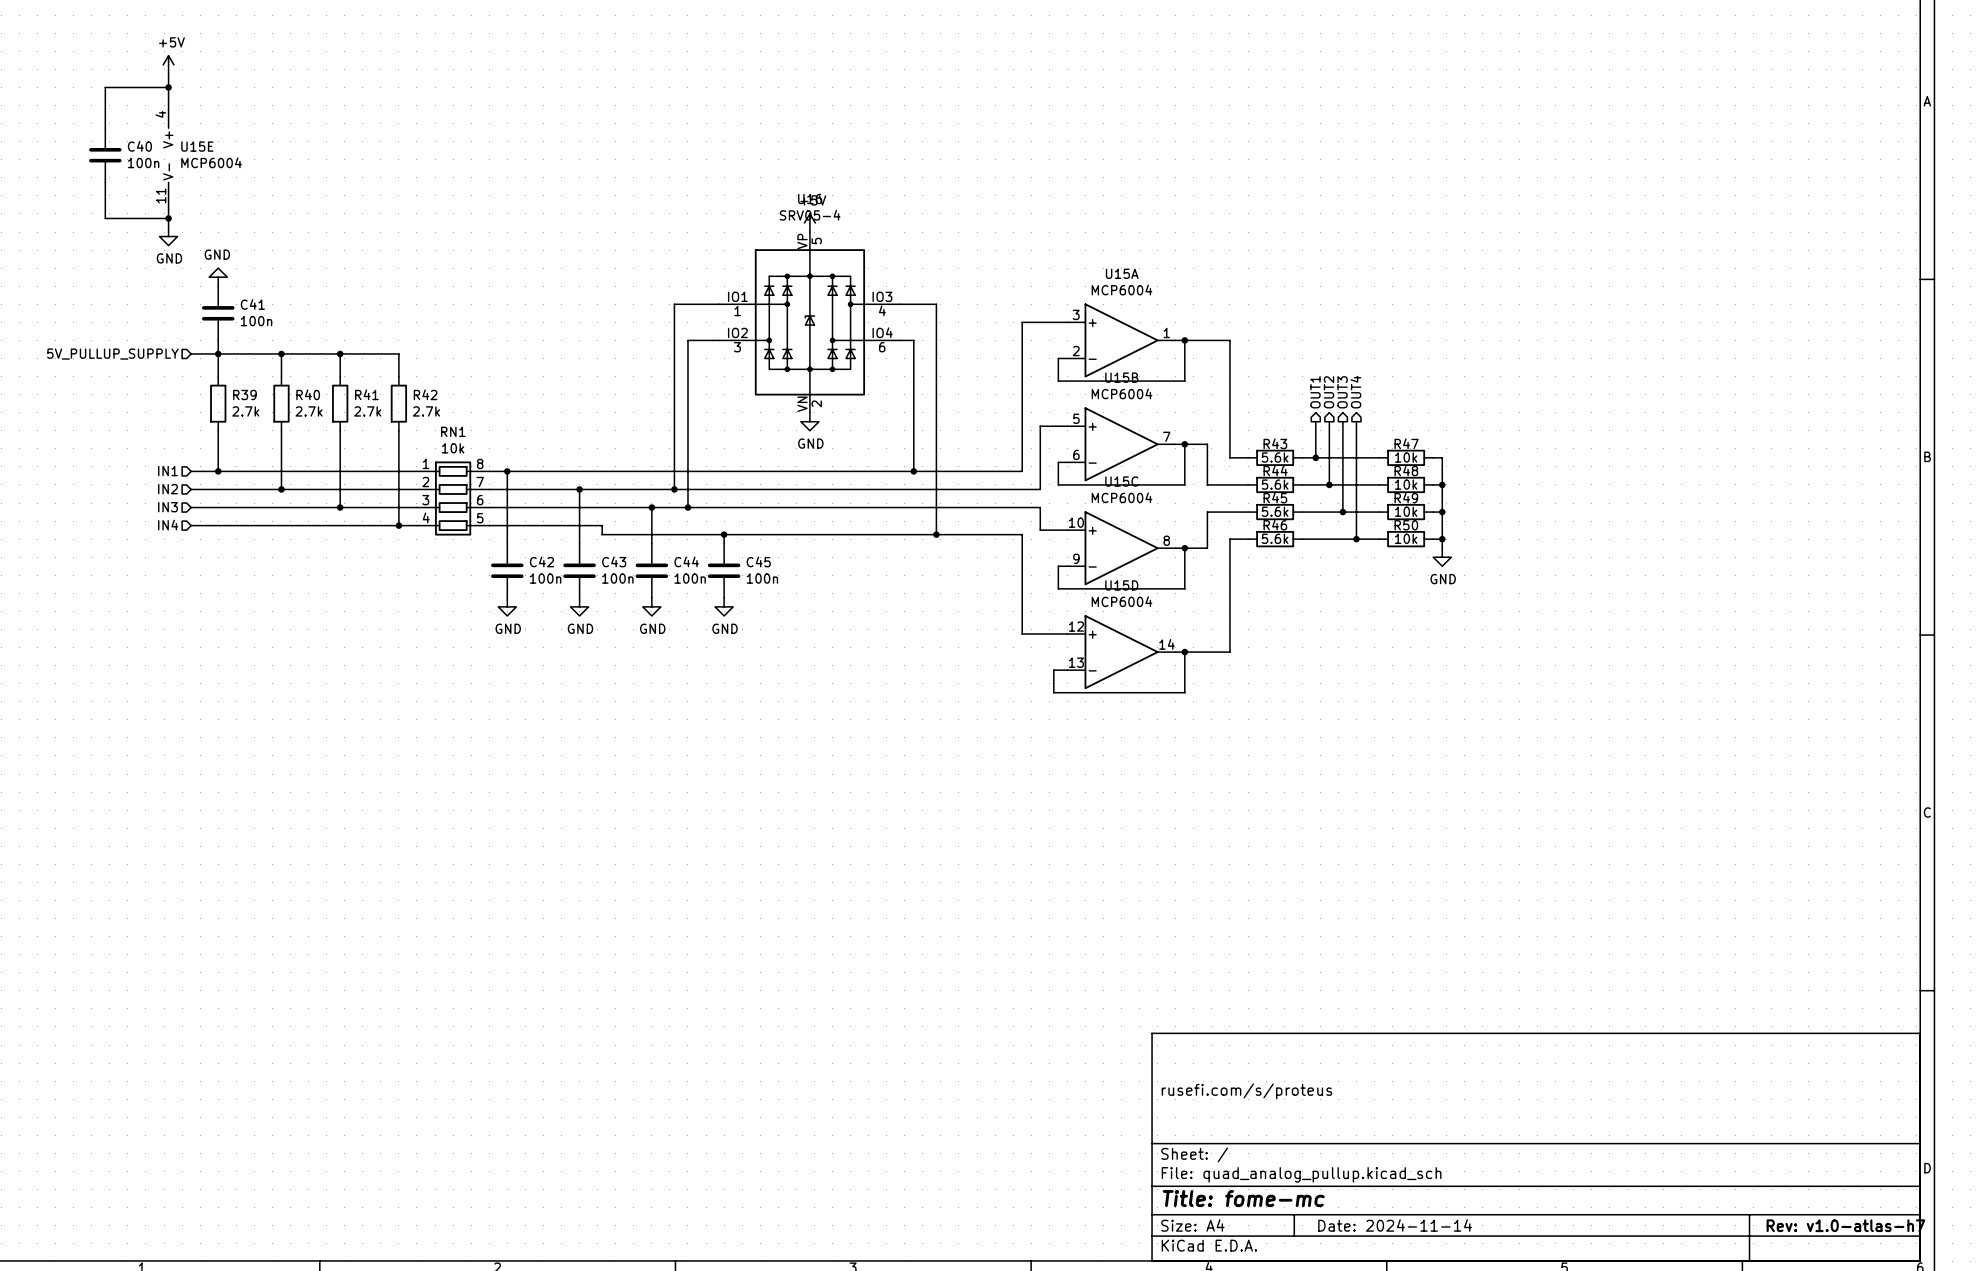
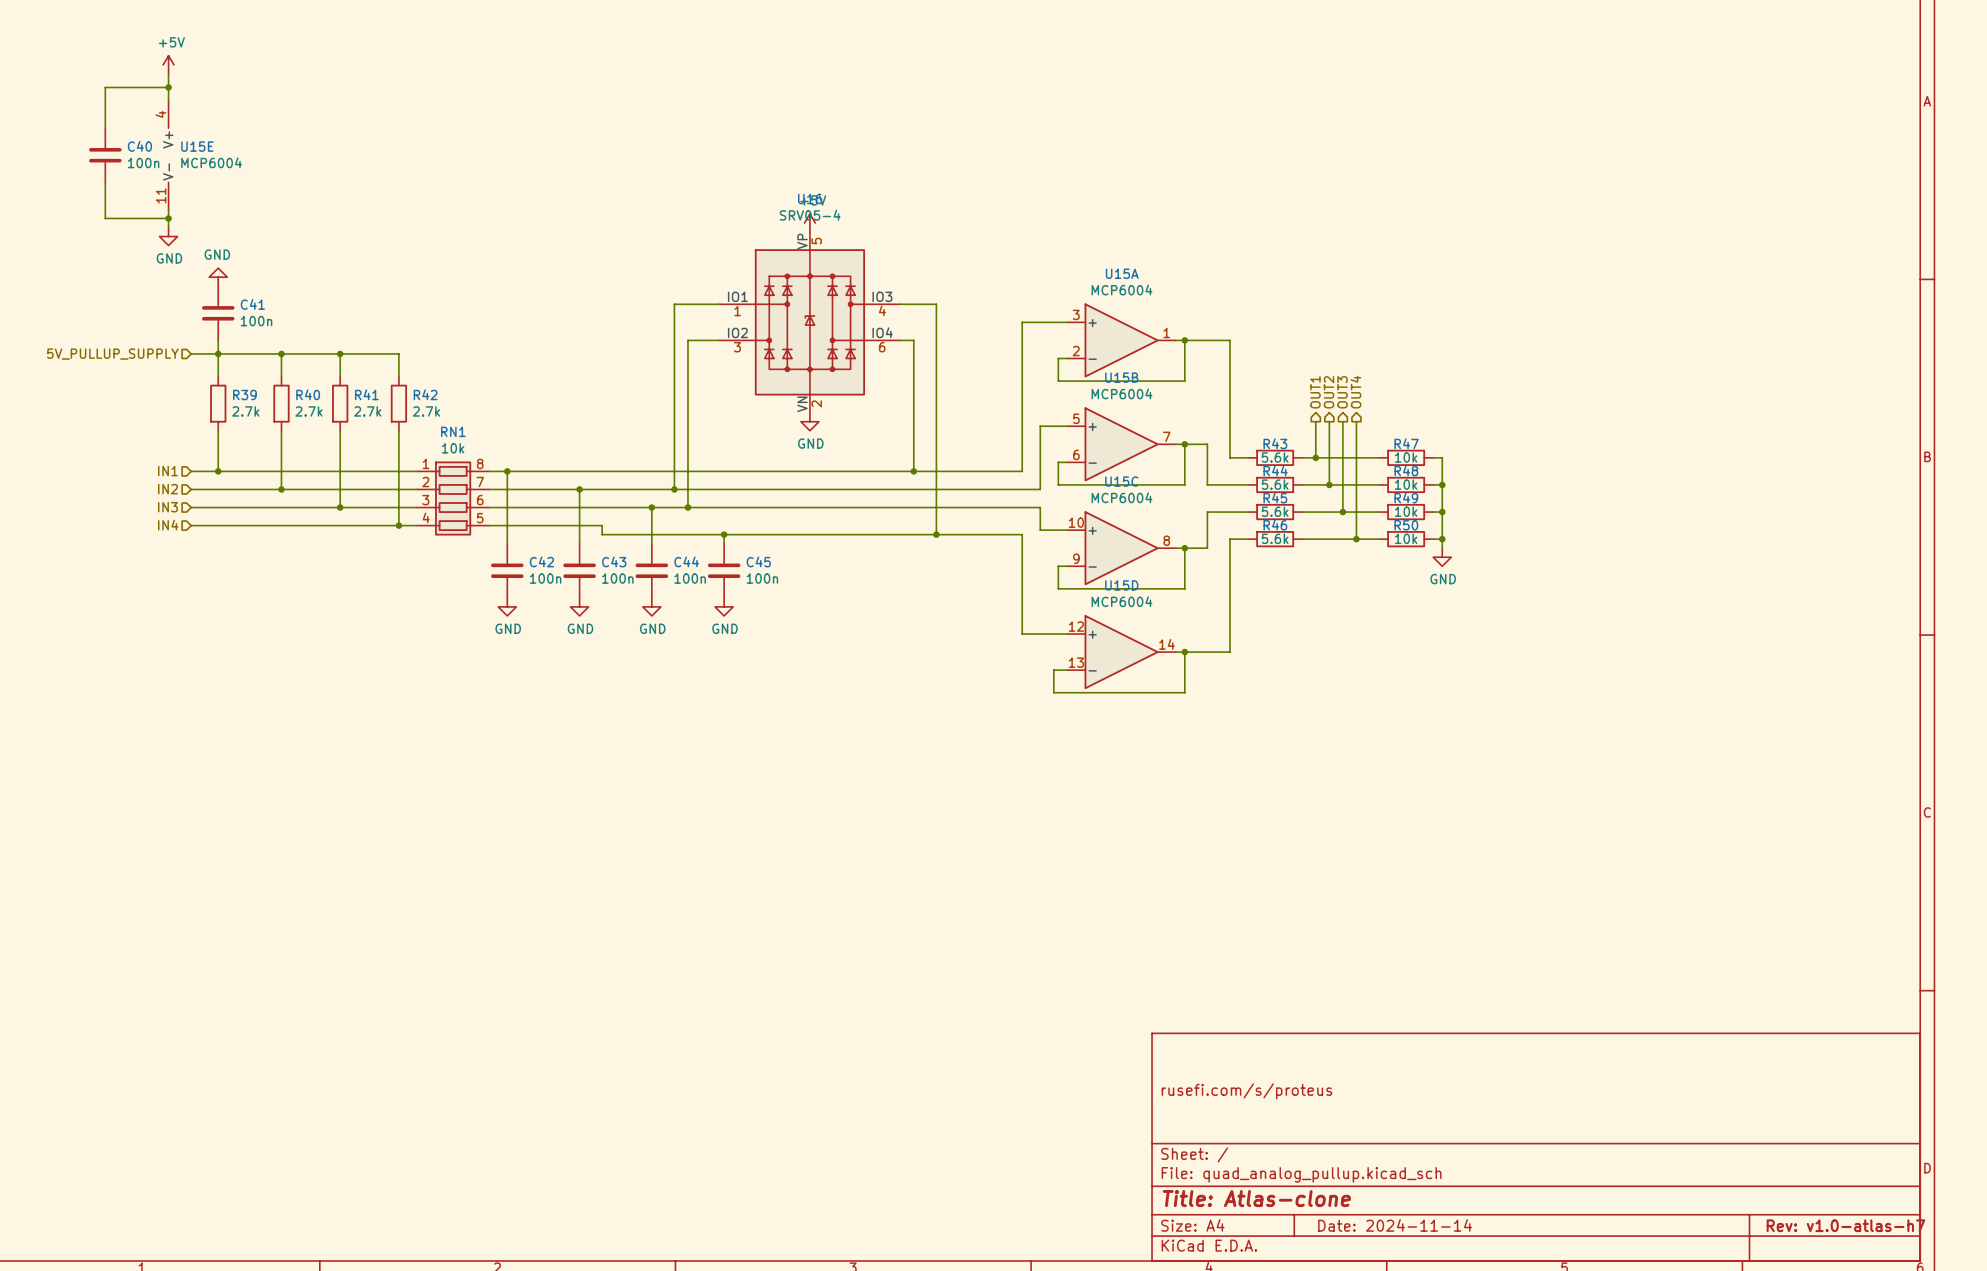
title block: Title: fome-mc (1243, 1198) -> Title: Atlas-clone (1256, 1198)

